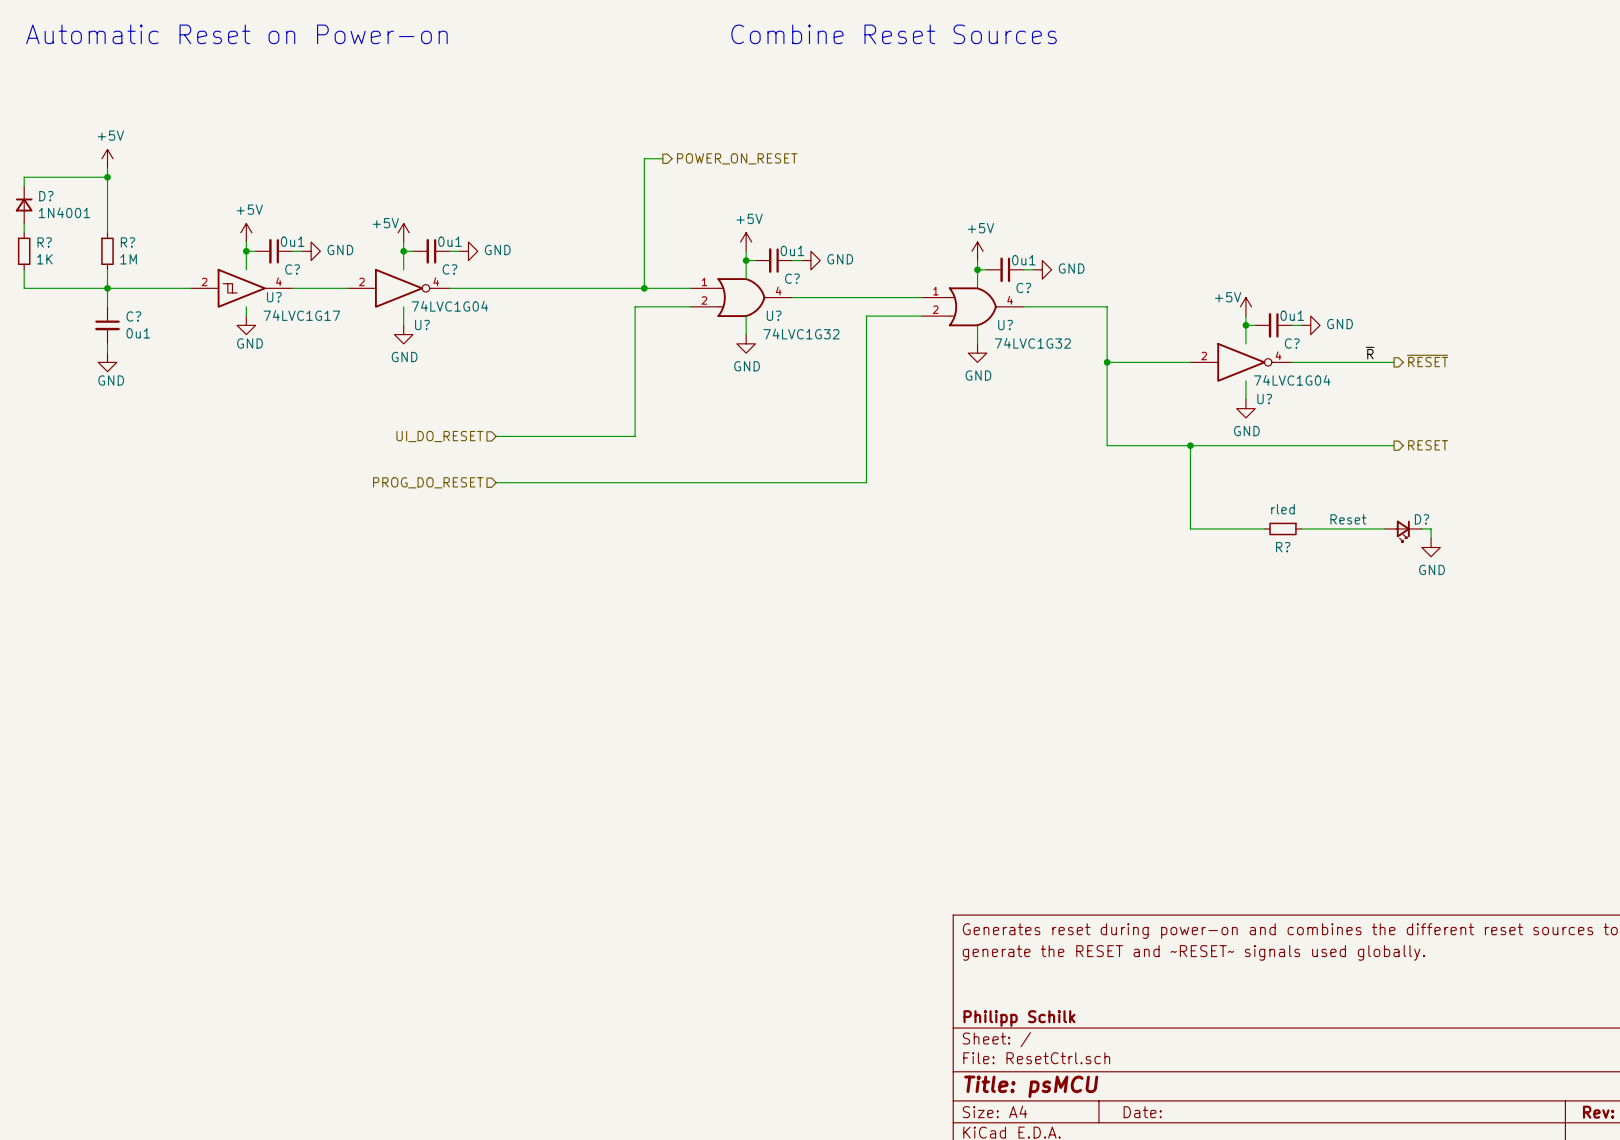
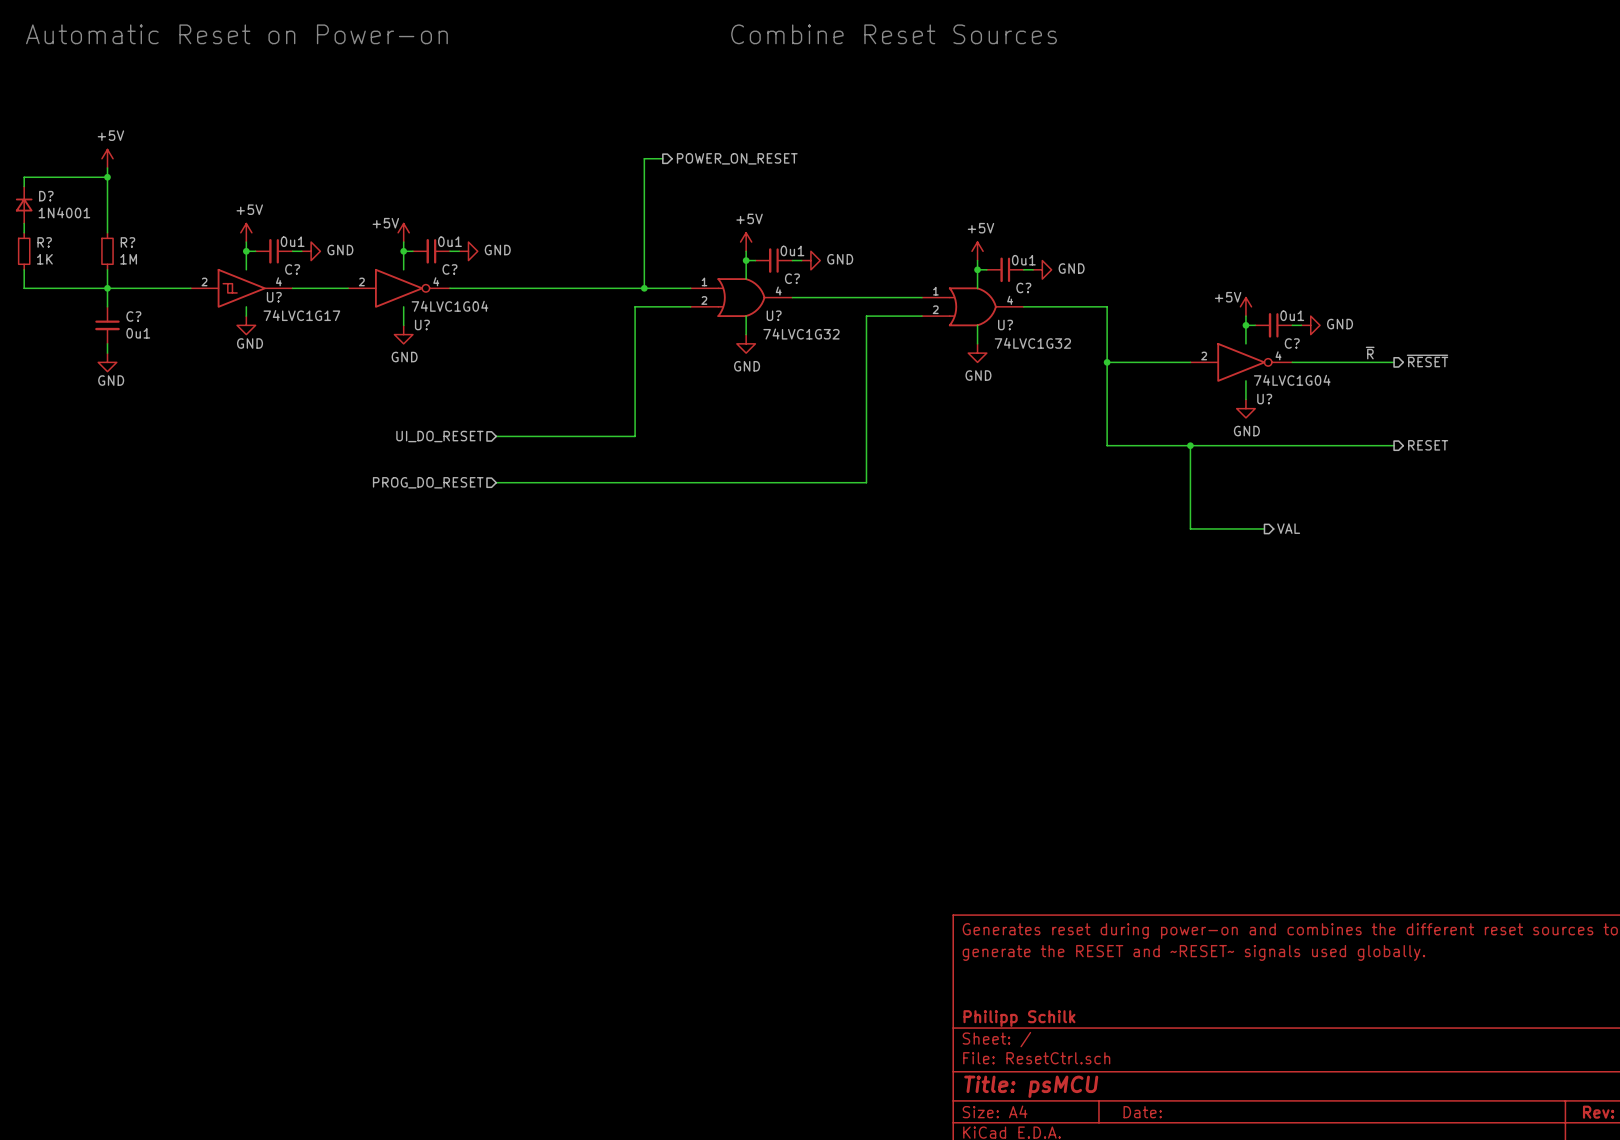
R?: rled (1282, 528) -> none
sheet pin: none -> VAL (1288, 528)
wire: (1301, 528) (1384, 528) -> none
wire: (1421, 528) (1431, 528) (1431, 538) -> none
D?: Reset (1403, 531) -> none
power symbol: GND (1431, 547) -> none

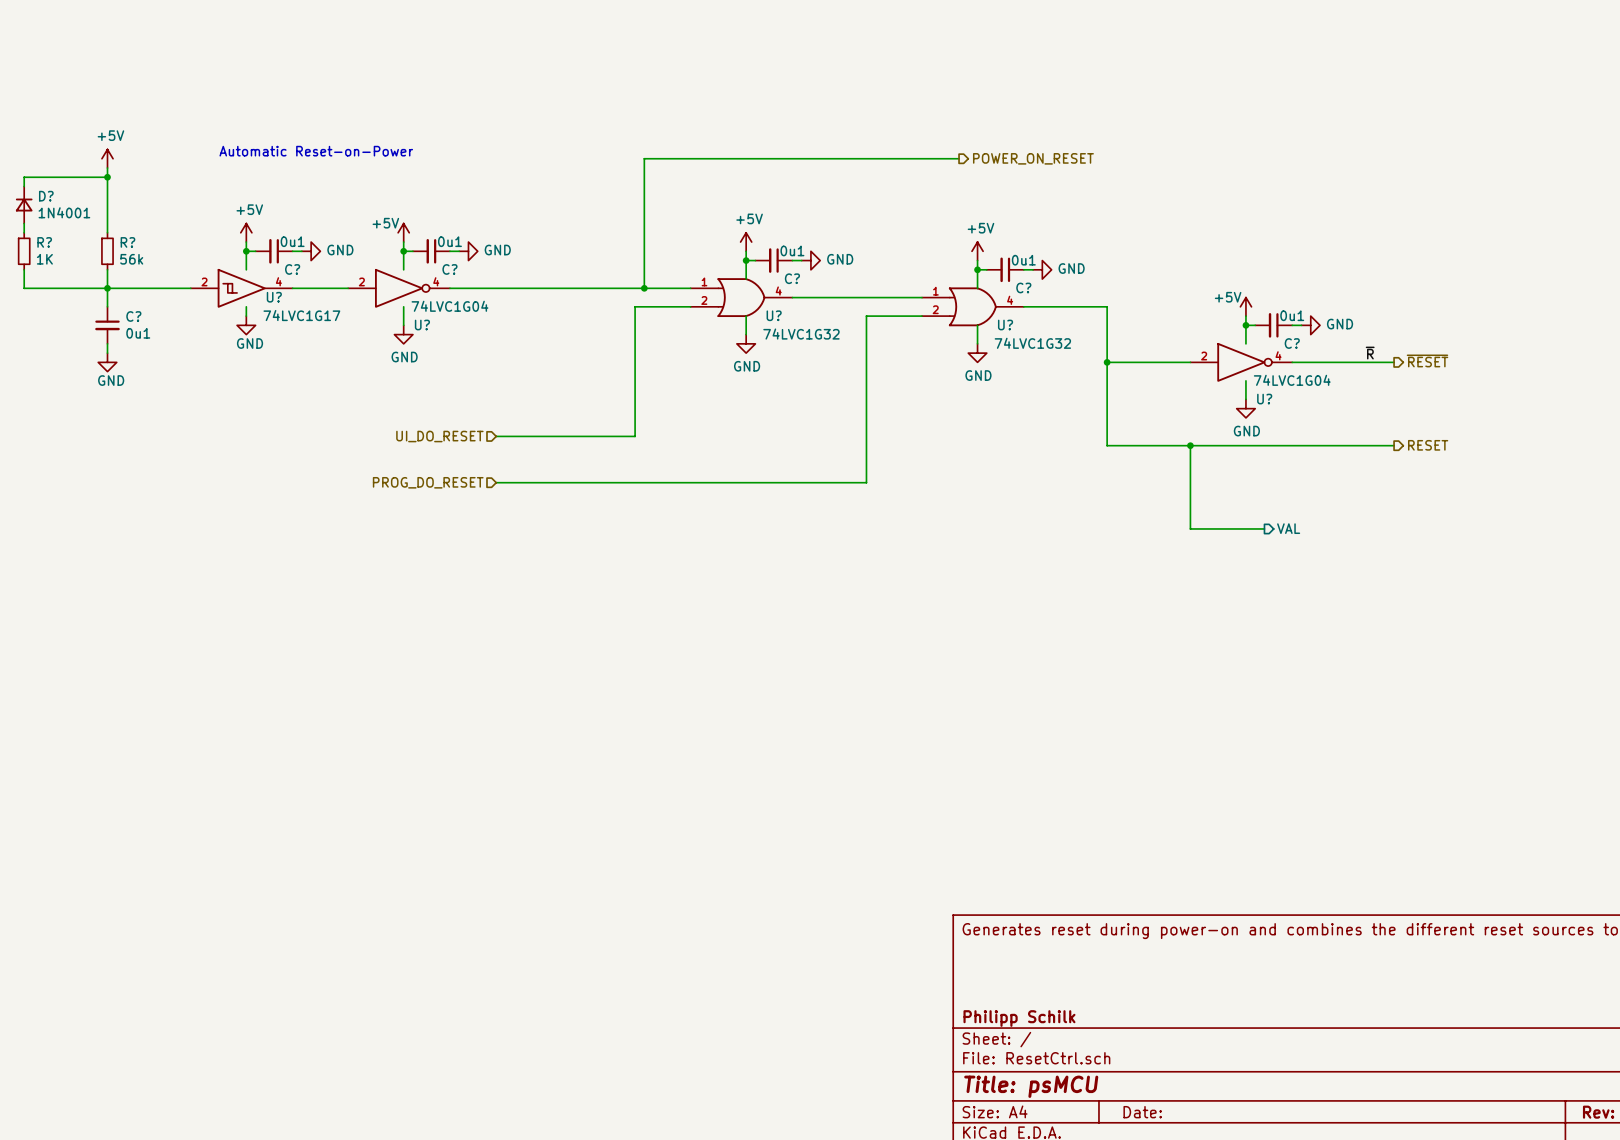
text: Automatic Reset on Power-on (236, 34) -> none
text: Combine Reset Sources (894, 34) -> none
text: none -> Automatic Reset-on-Power (316, 151)
wire: none -> (662, 158) (959, 158)
hierarchical label: POWER_ON_RESET (737, 158) -> none
hierarchical label: none -> POWER_ON_RESET (1033, 158)
R? value: 1M (128, 259) -> 56k (131, 259)
title block: generate the RESET and ~RESET~ signals used globally. (1193, 952) -> none

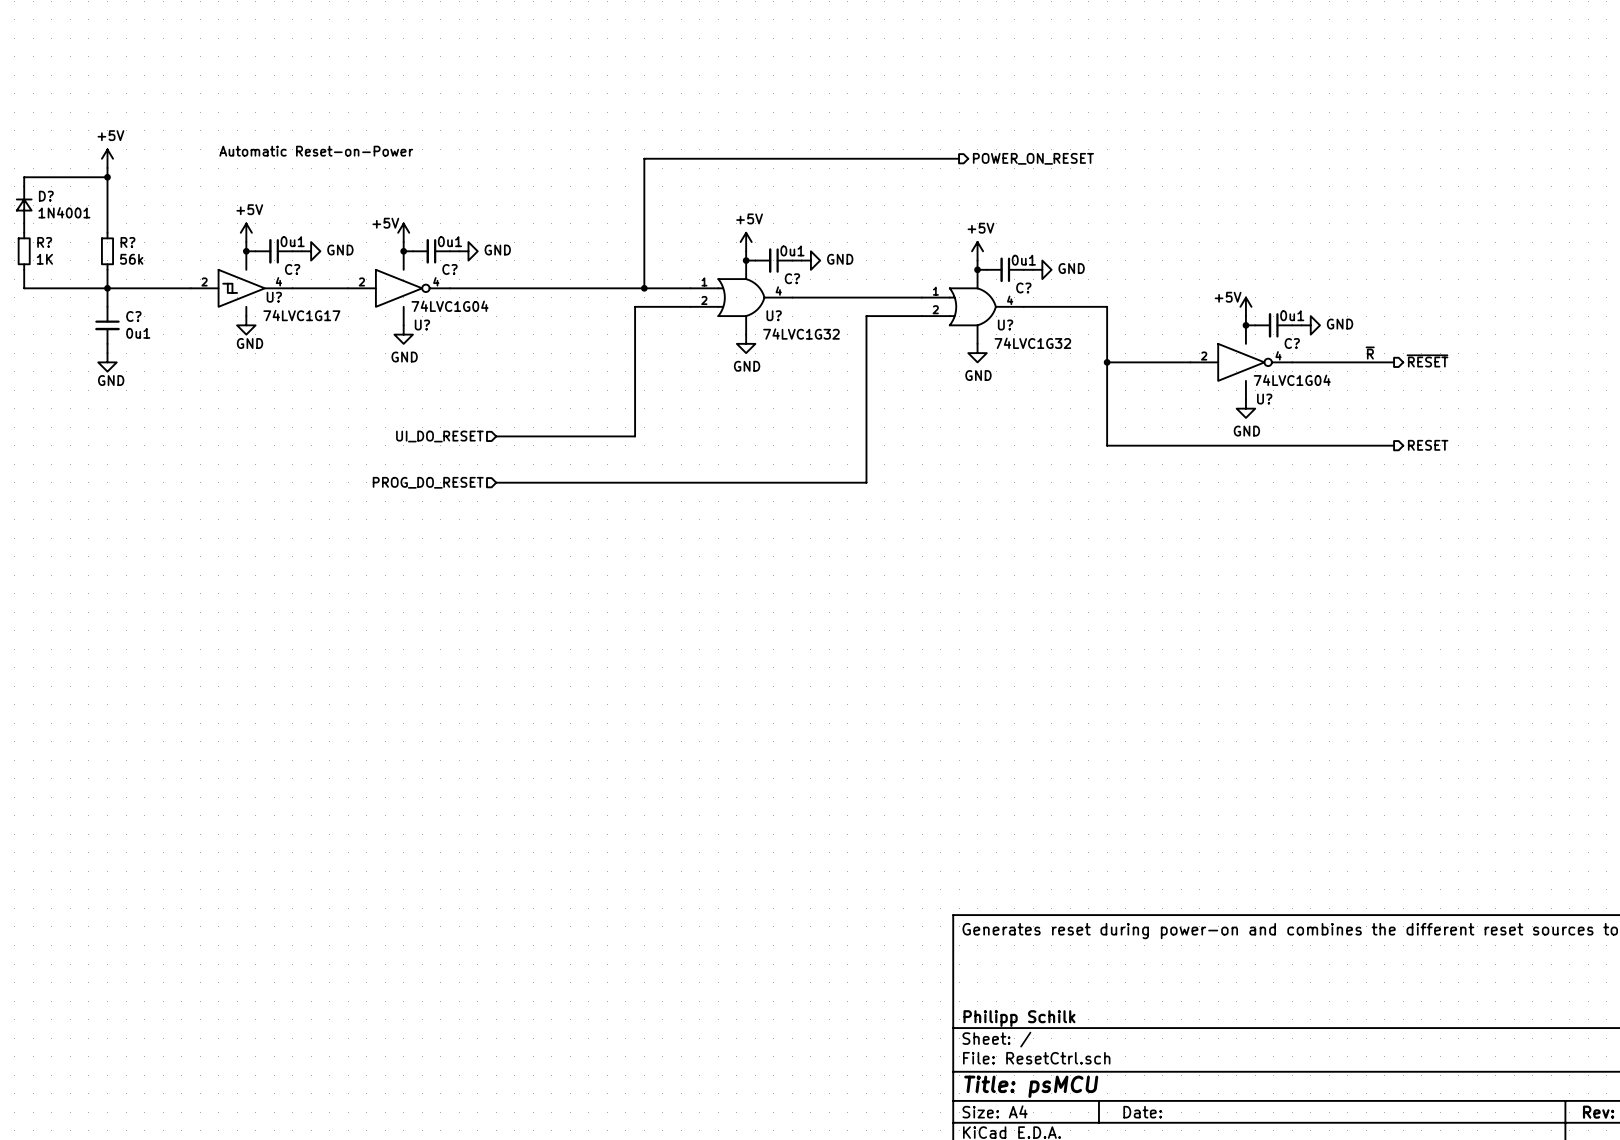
wire: (1190, 445) (1190, 528) (1264, 528) -> none
junction: (1190, 445) -> none
sheet pin: VAL (1288, 528) -> none

